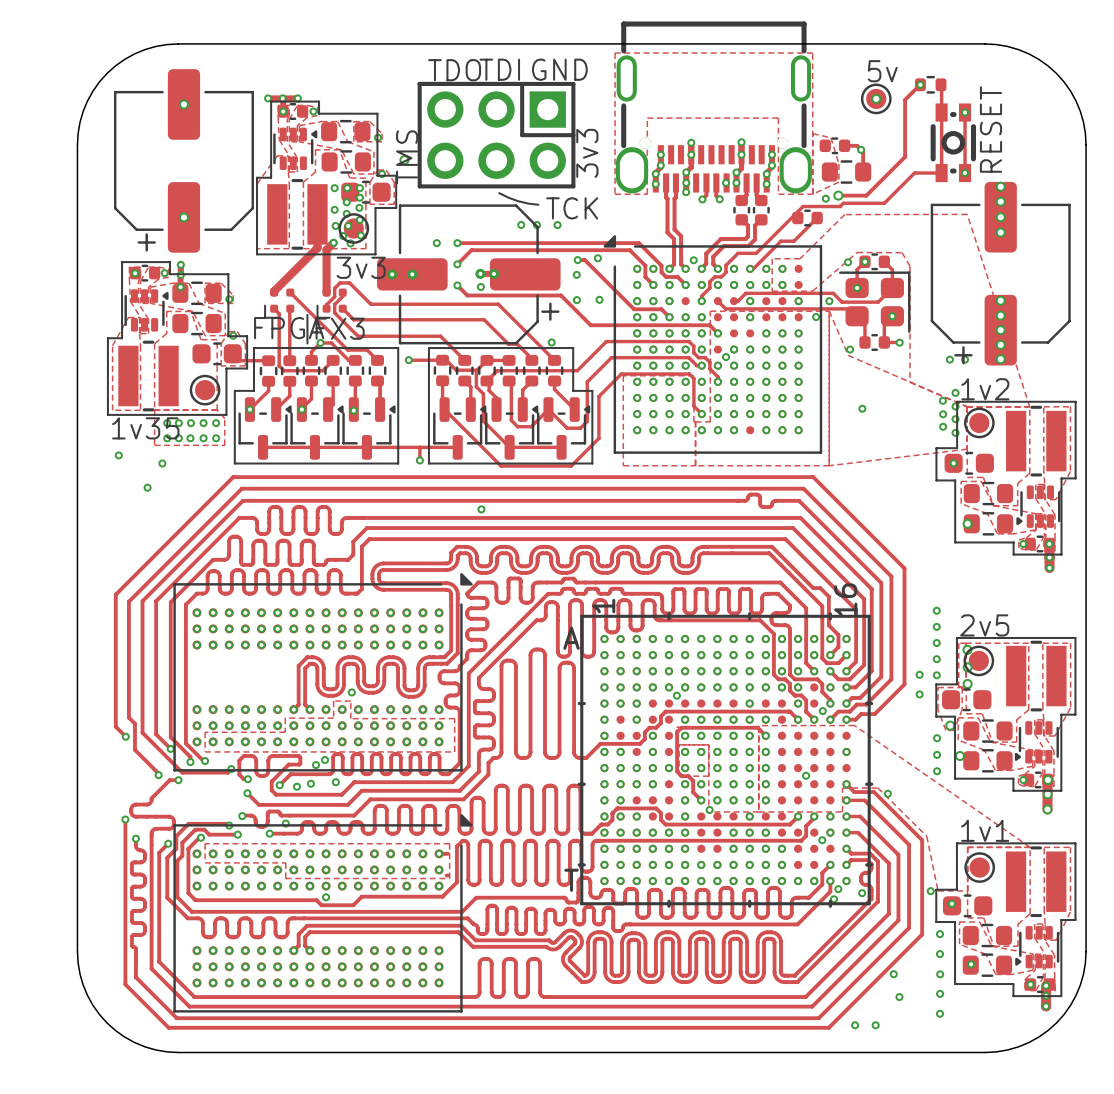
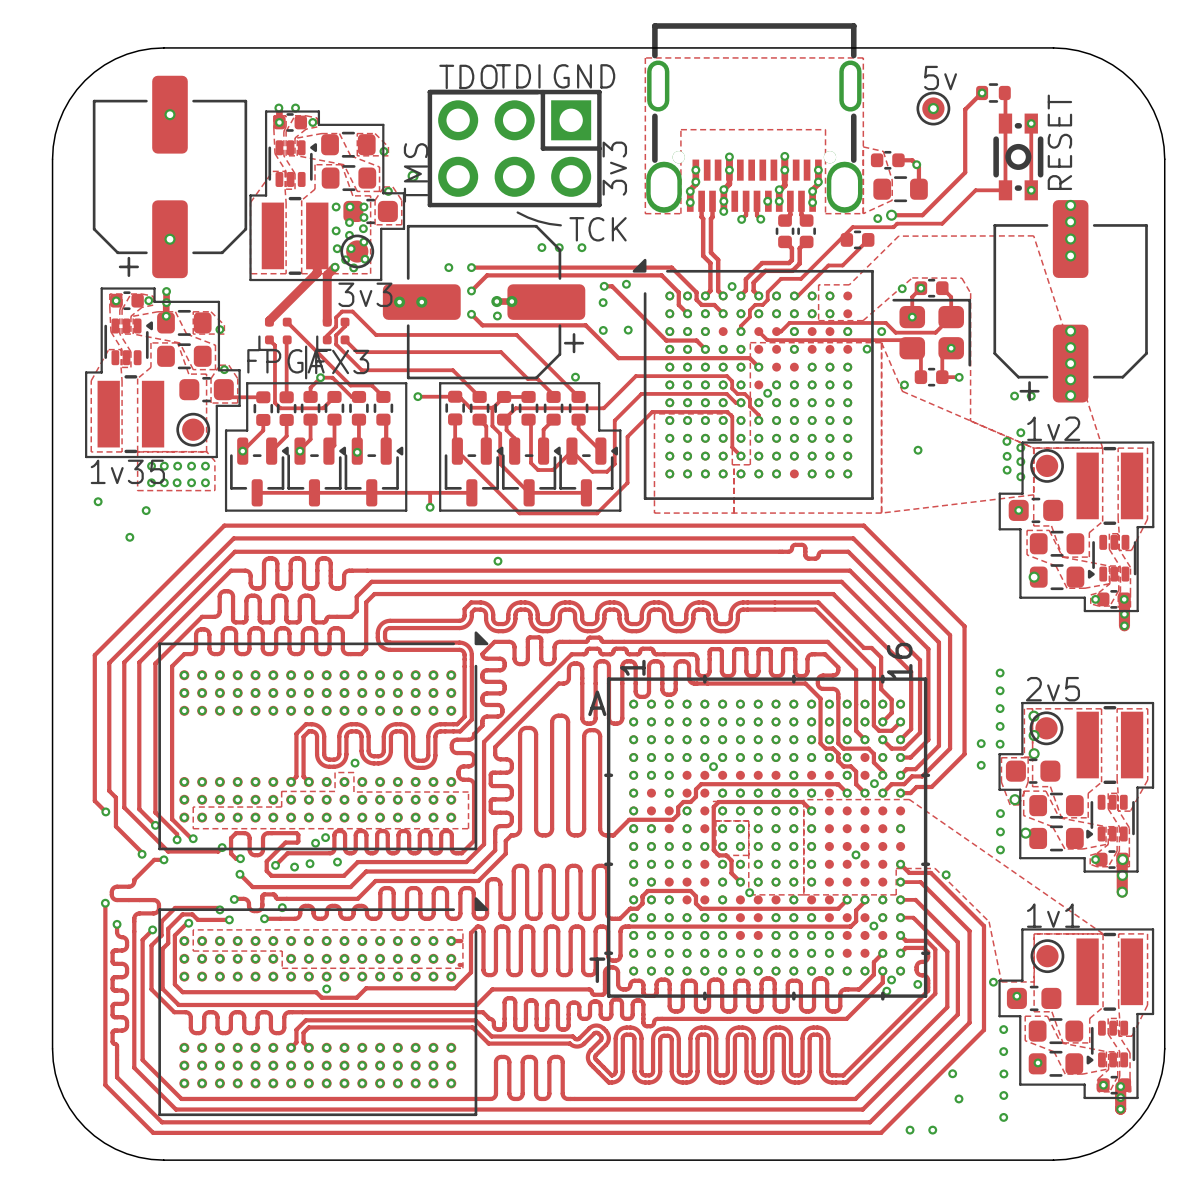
track: (268, 98) (297, 98) -> none
via: (268, 98) -> none

